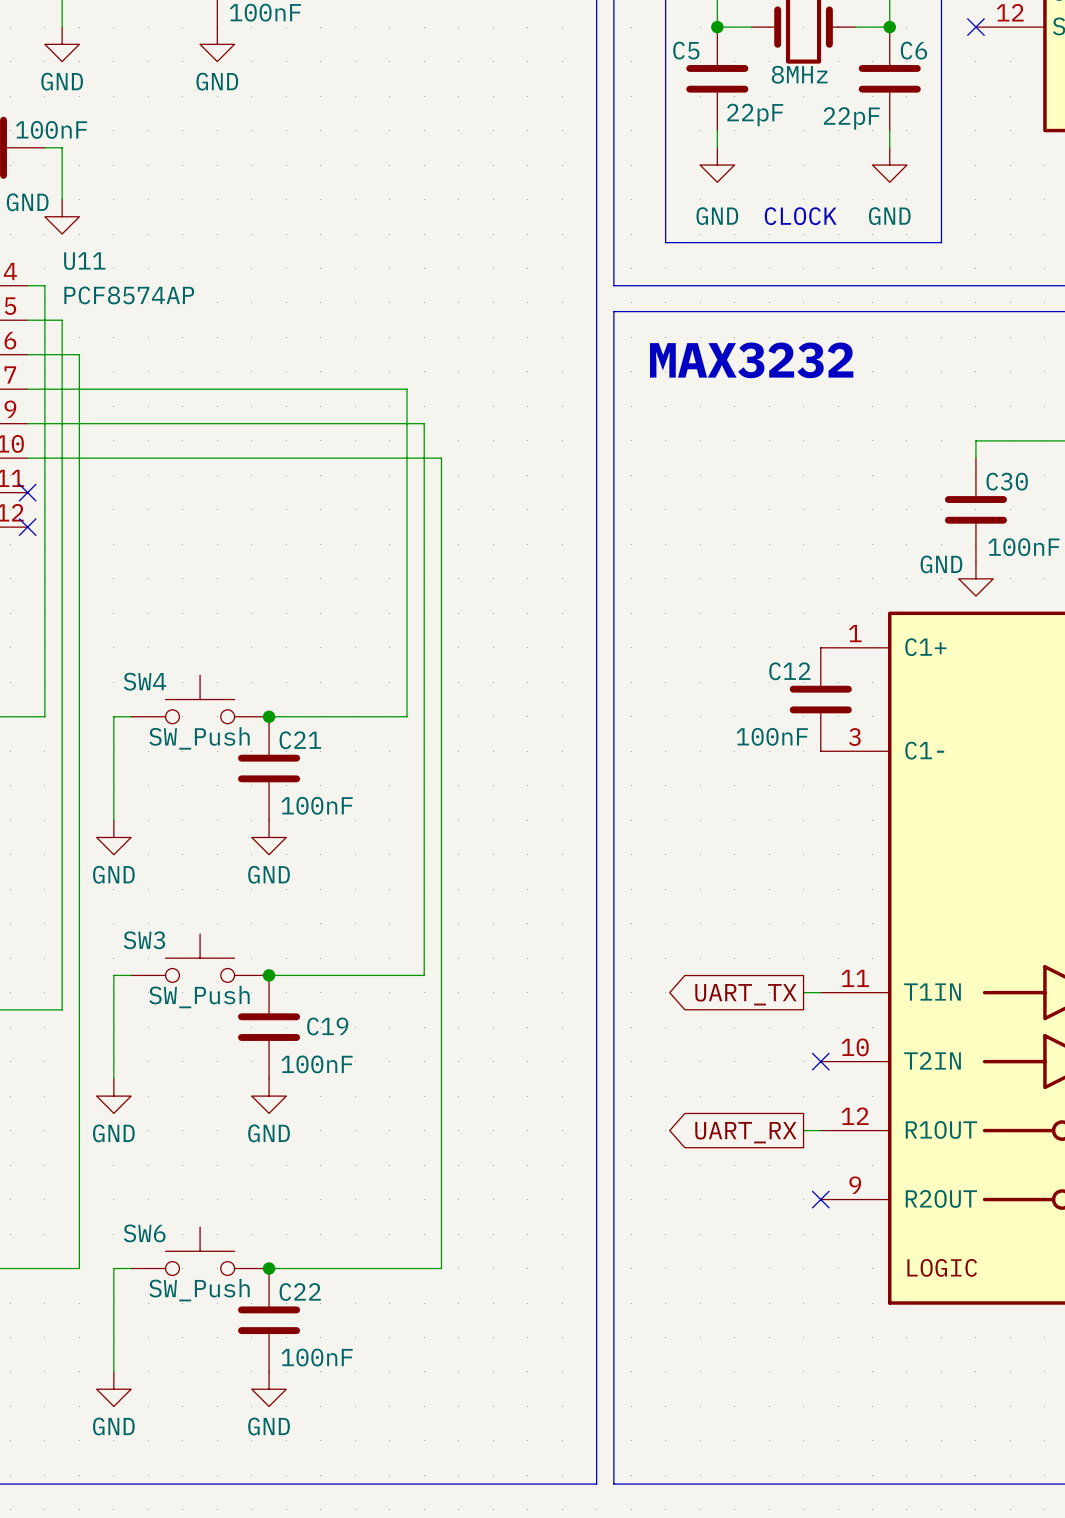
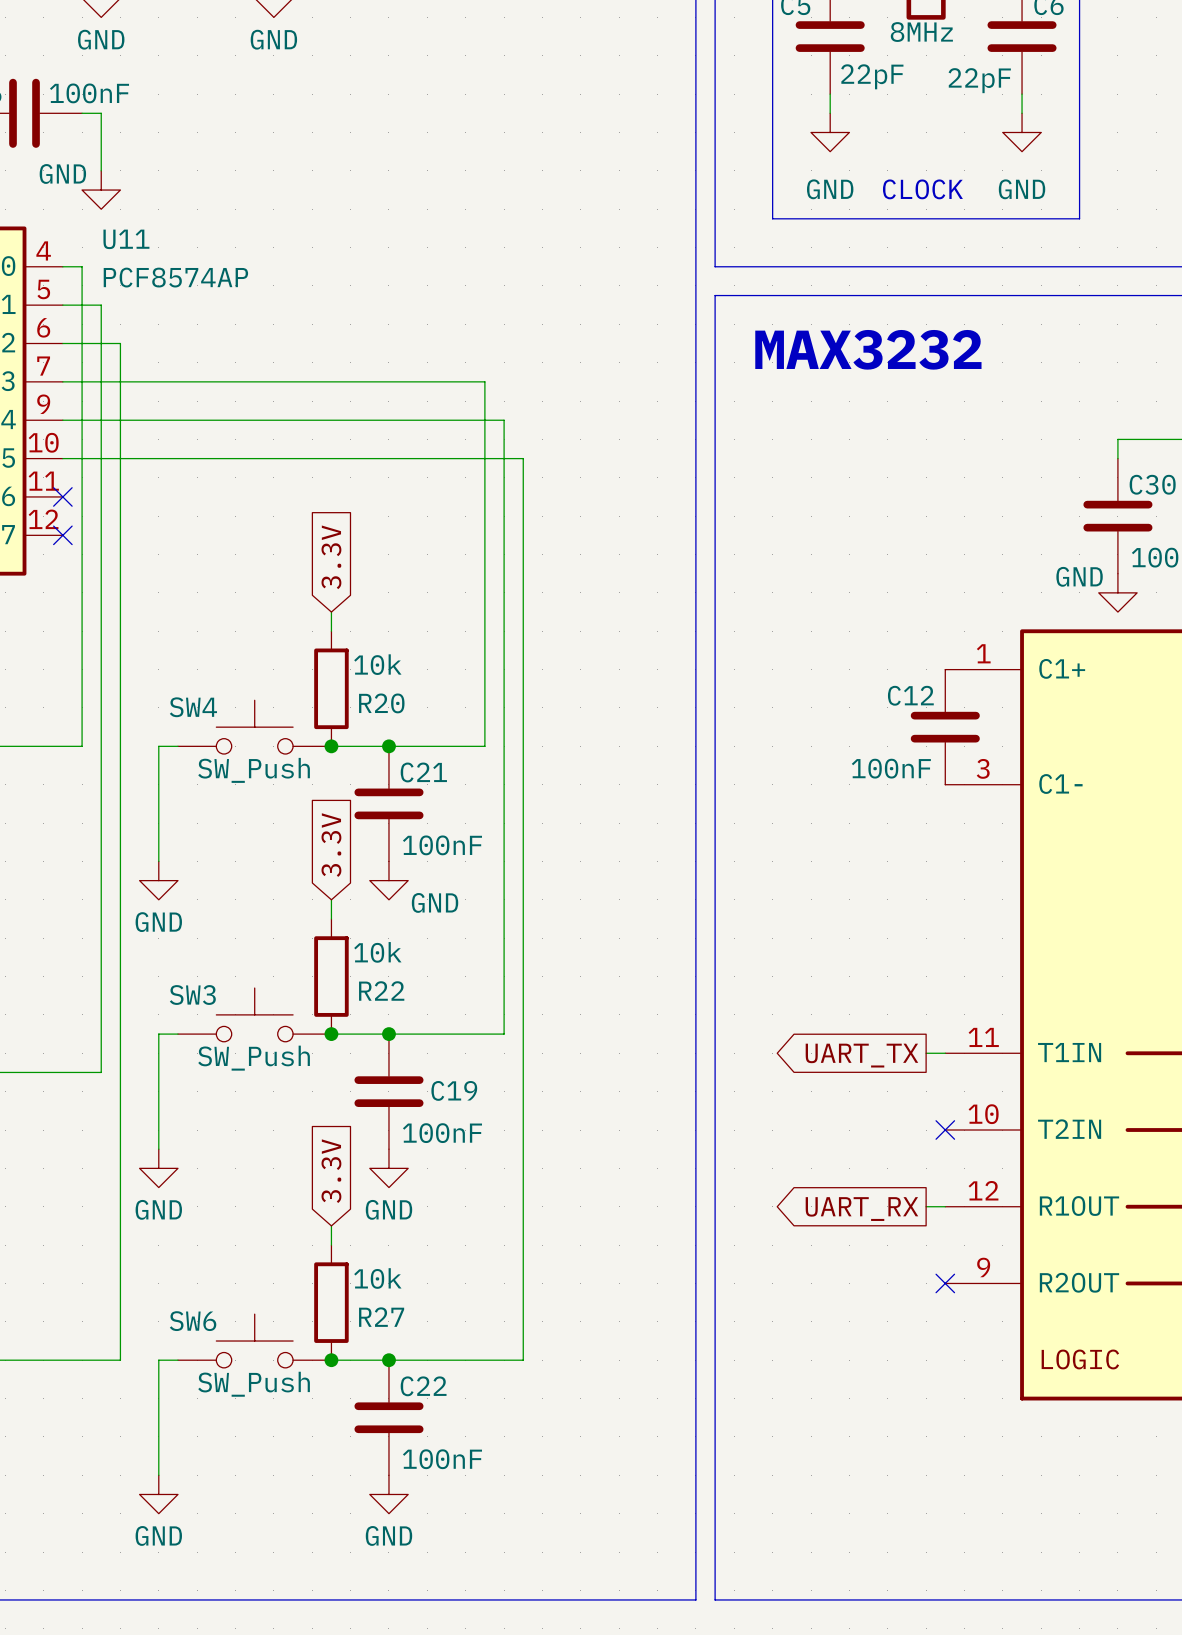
global label: none -> 3.3V (331, 557)
wire: none -> (331, 612) (331, 631)
R20: none -> 10k (331, 688)
junction: none -> (388, 746)
C21 position: (269, 768) -> (388, 803)
global label: none -> 3.3V (331, 845)
power symbol position: GND (269, 837) -> GND (388, 880)
wire: none -> (331, 899) (331, 918)
power symbol text position: GND (269, 874) -> GND (435, 902)
R22: none -> 10k (331, 976)
junction: none -> (388, 1034)
C19 position: (269, 1027) -> (388, 1091)
power symbol position: GND (269, 1096) -> GND (388, 1168)
global label: none -> 3.3V (331, 1171)
wire: none -> (331, 1225) (331, 1245)
R27: none -> 10k (331, 1302)
junction: none -> (388, 1360)
C22 position: (269, 1320) -> (388, 1417)
power symbol position: GND (269, 1389) -> GND (388, 1494)

